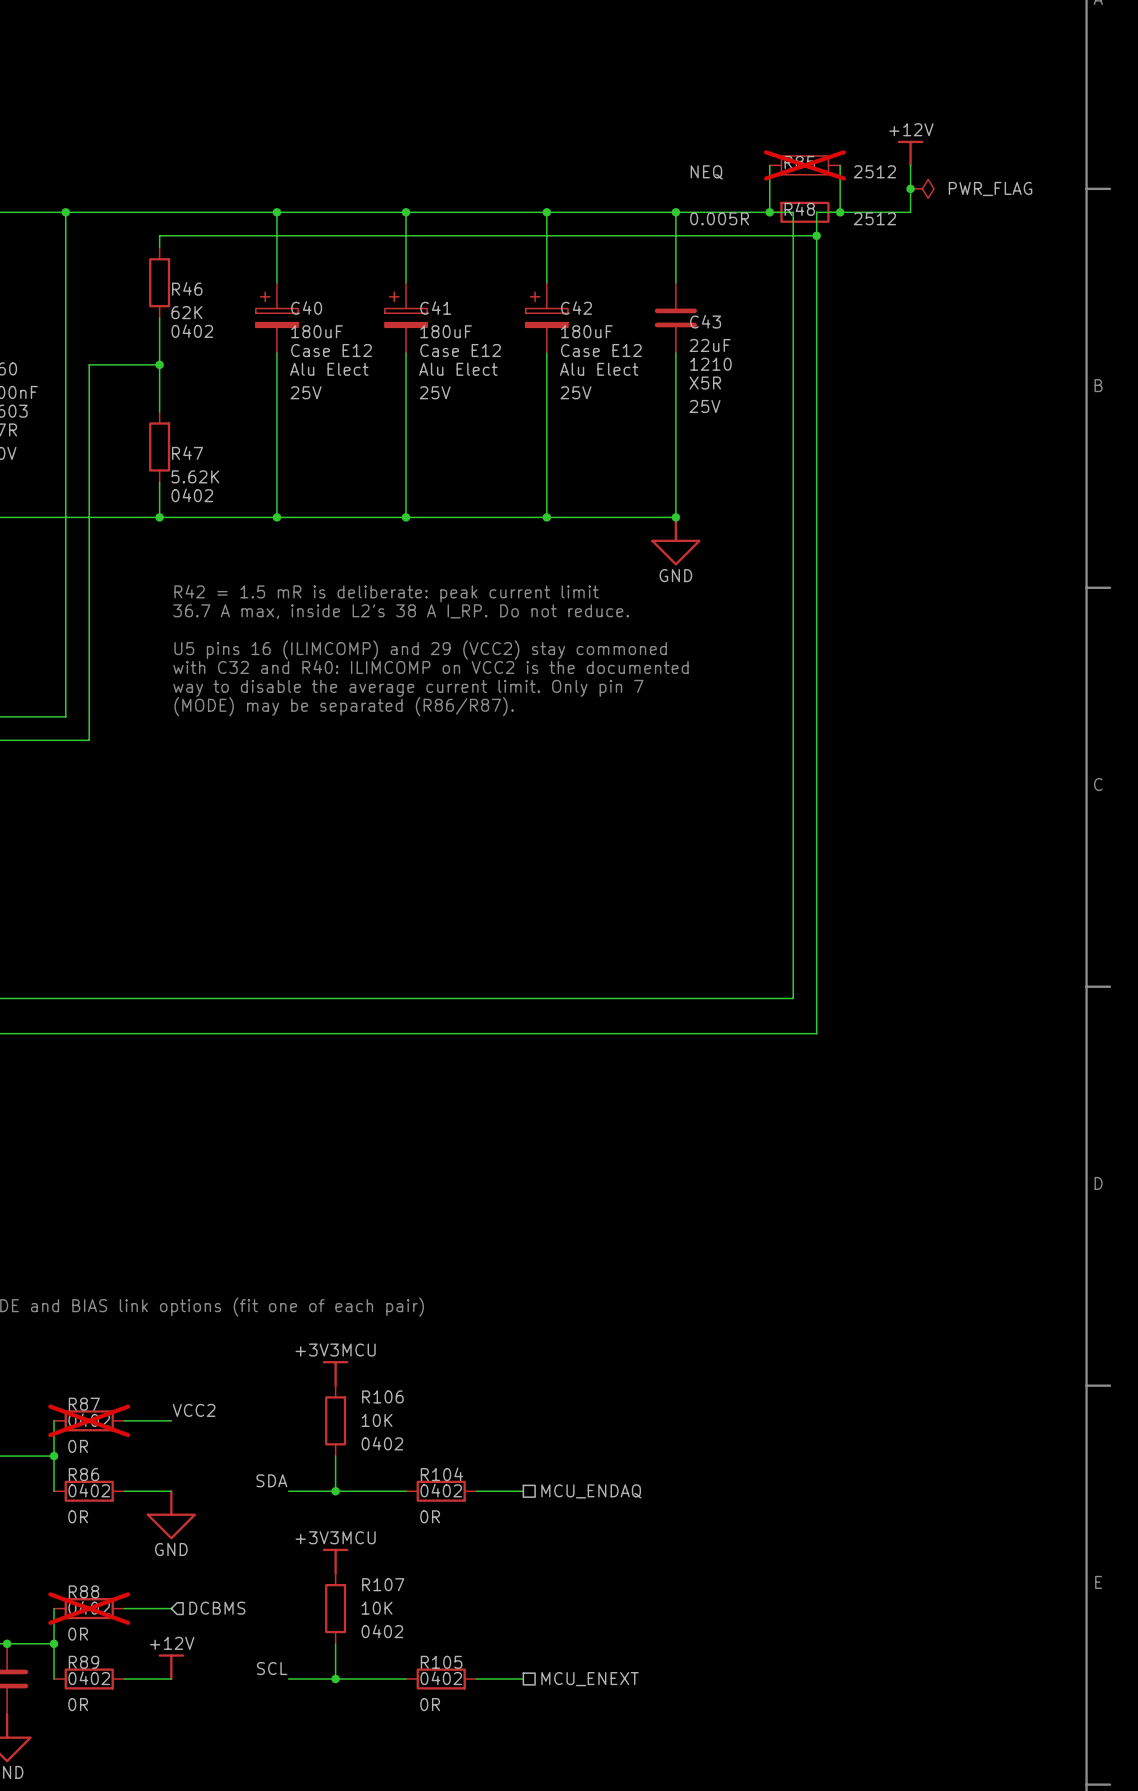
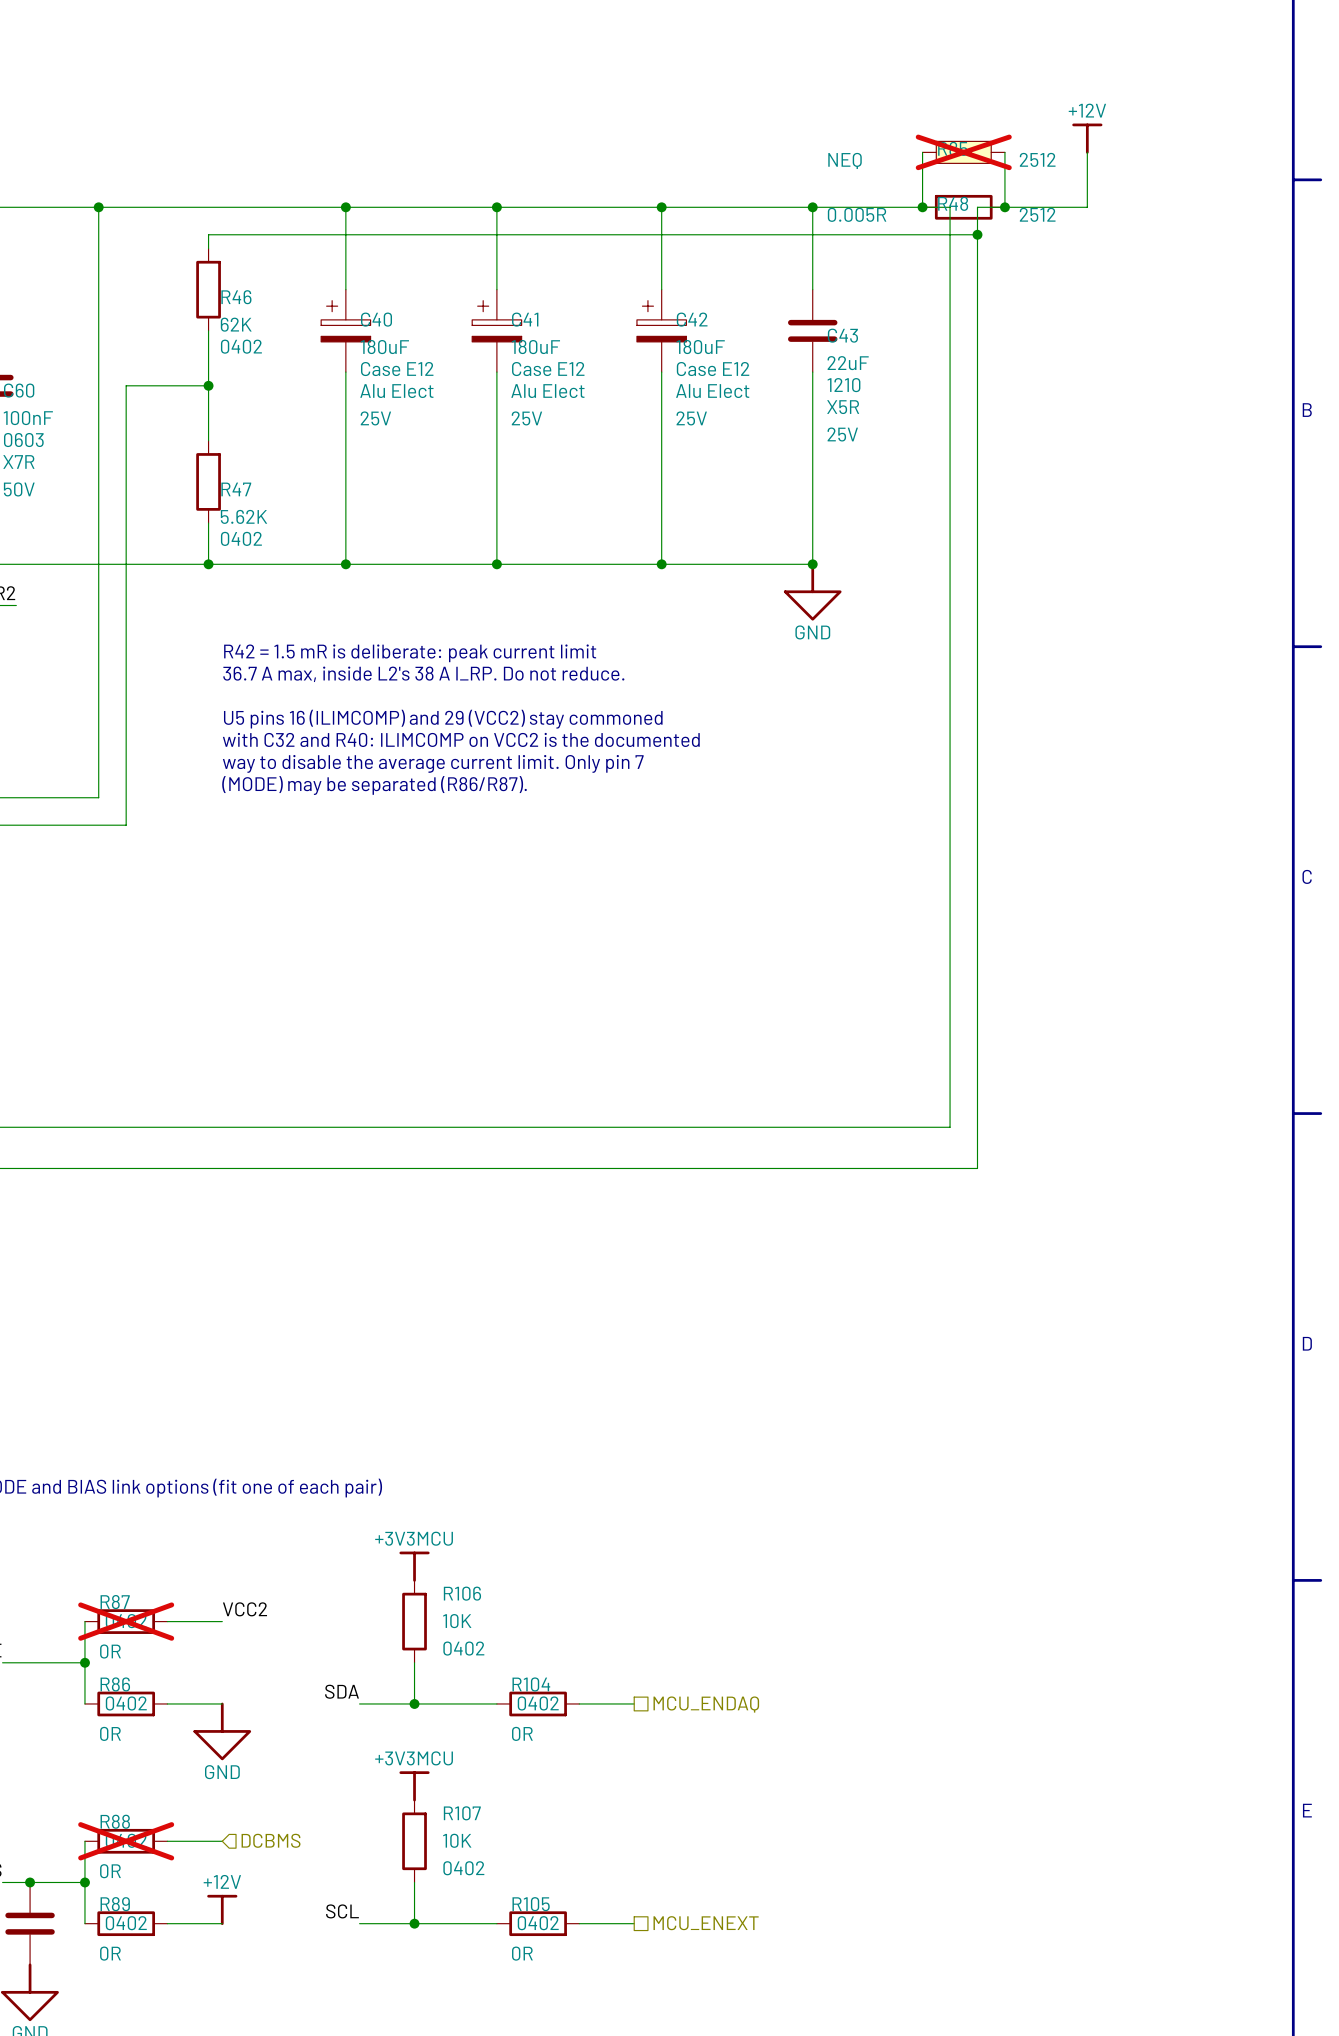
junction: (910, 188) -> none
power symbol: PWR_FLAG (922, 188) -> none

